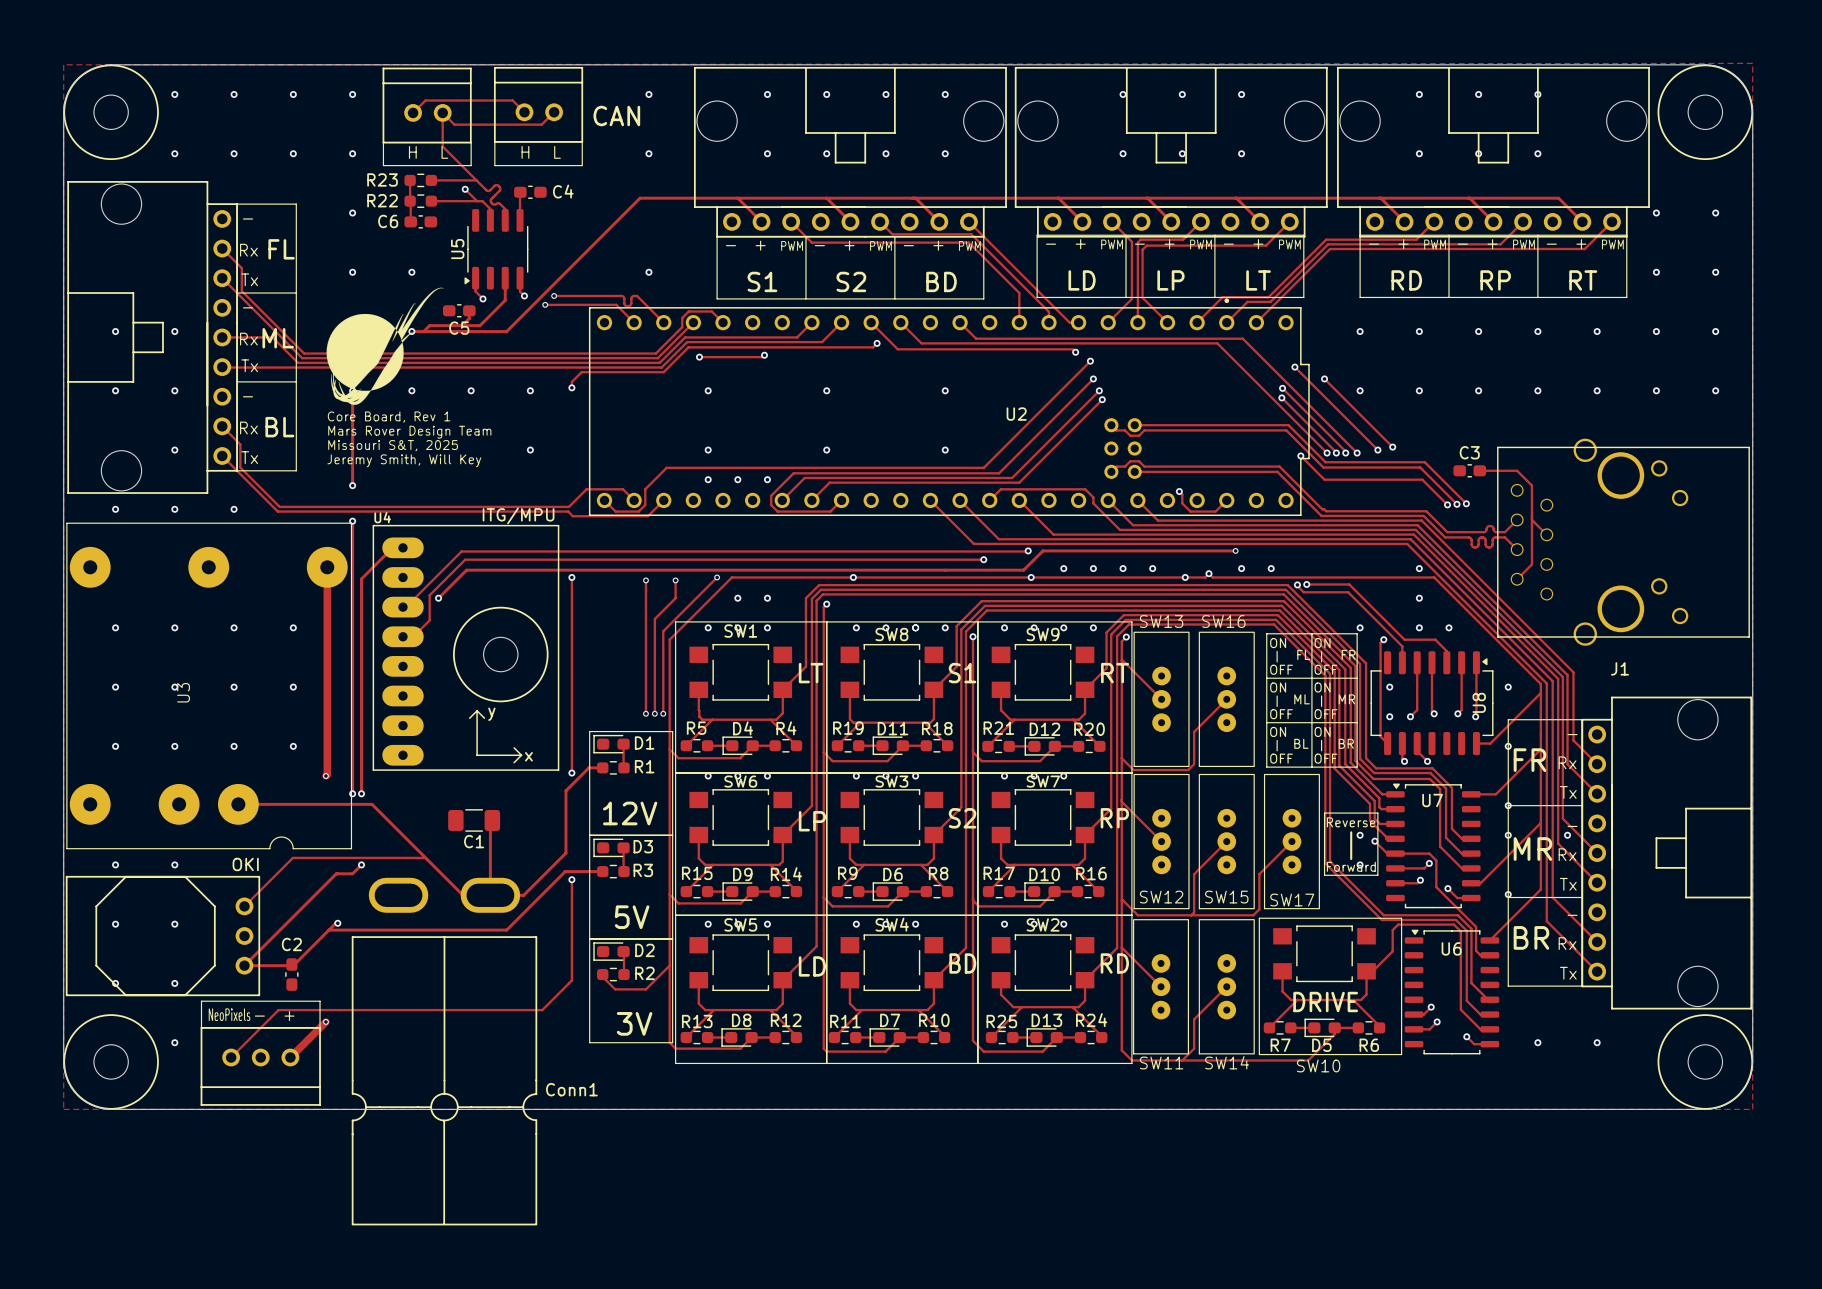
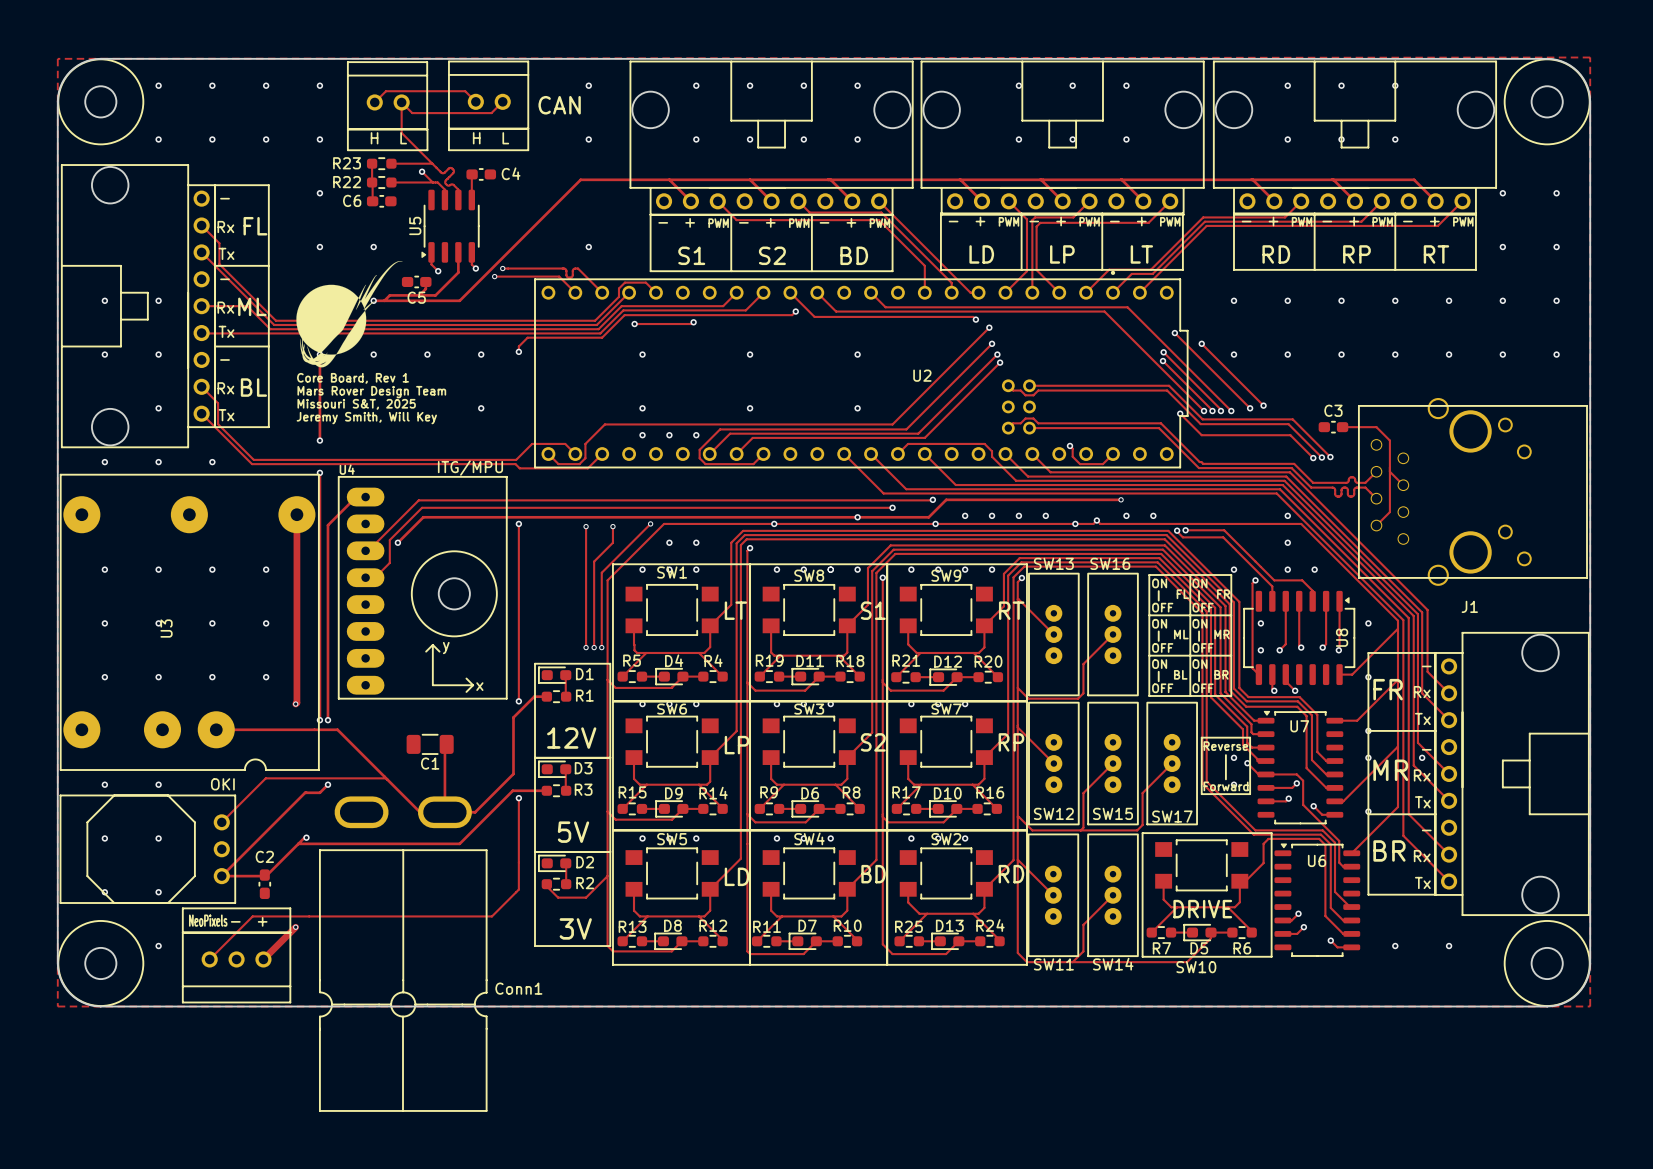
via: none -> (857, 517)

